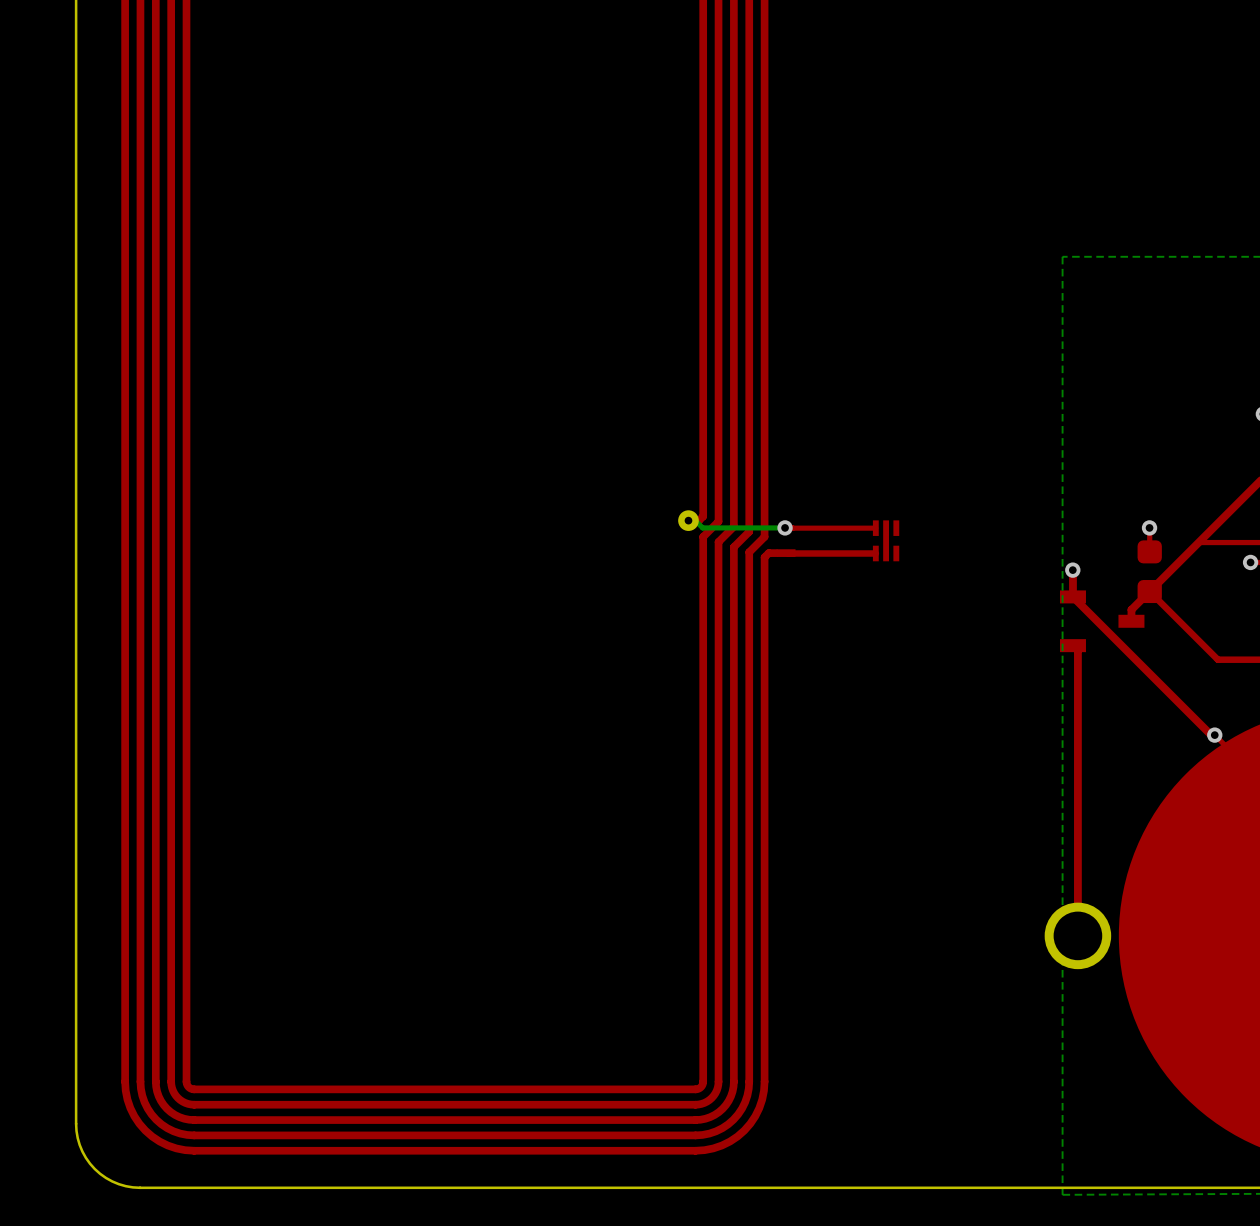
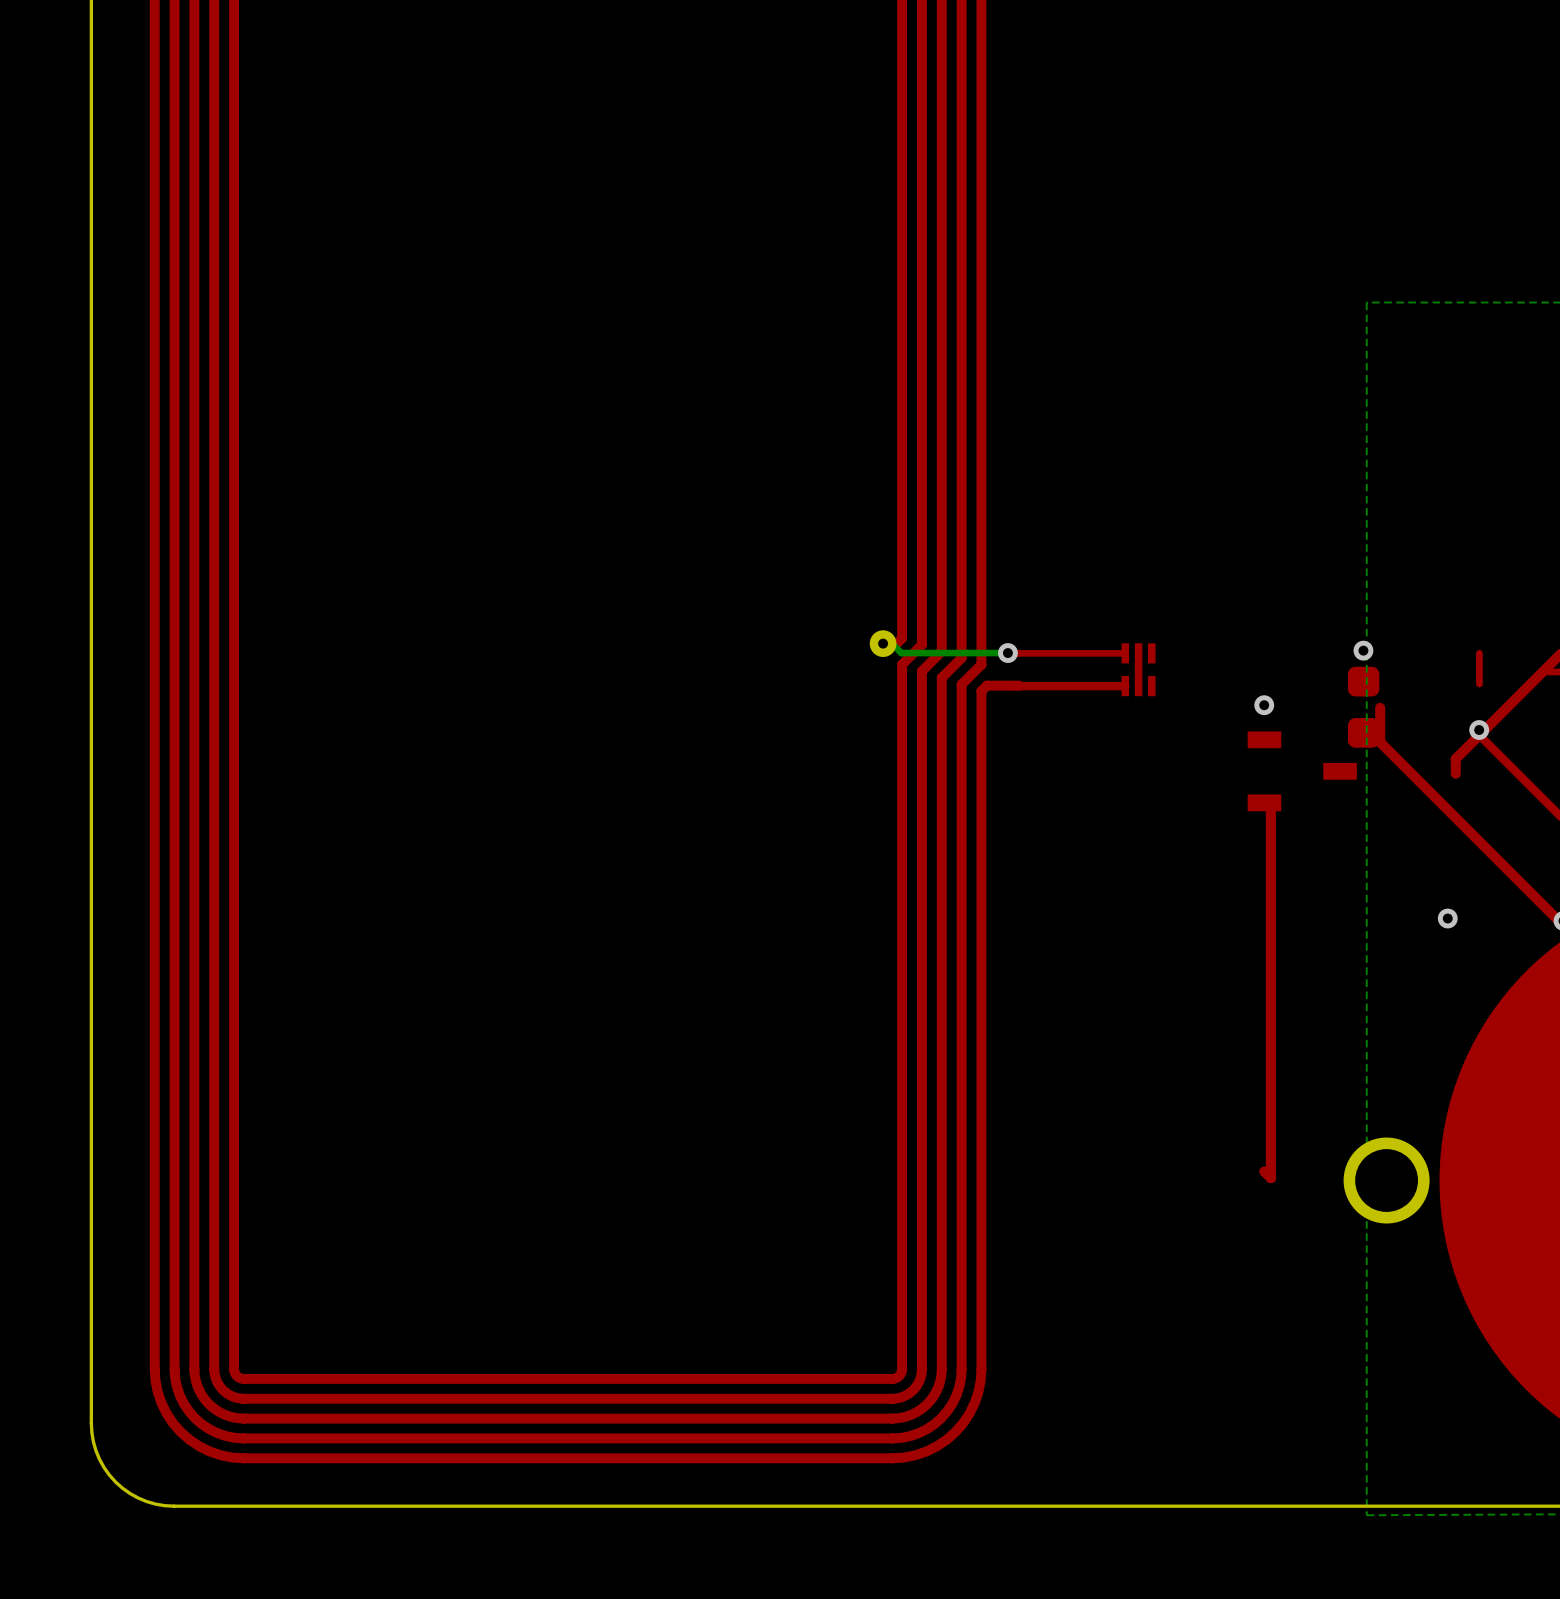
via: none -> (1363, 650)
via: (1149, 527) -> none
via: none -> (1264, 705)
via: (1072, 570) -> none
part position: (1149, 571) -> (1363, 707)
via: none -> (1479, 730)
part position: (1102, 621) -> (1302, 771)
top track: (1072, 645) (1077, 650) (1077, 935) (1072, 930) -> (1264, 802) (1270, 809) (1270, 1178) (1264, 1171)
via: none -> (1447, 918)

